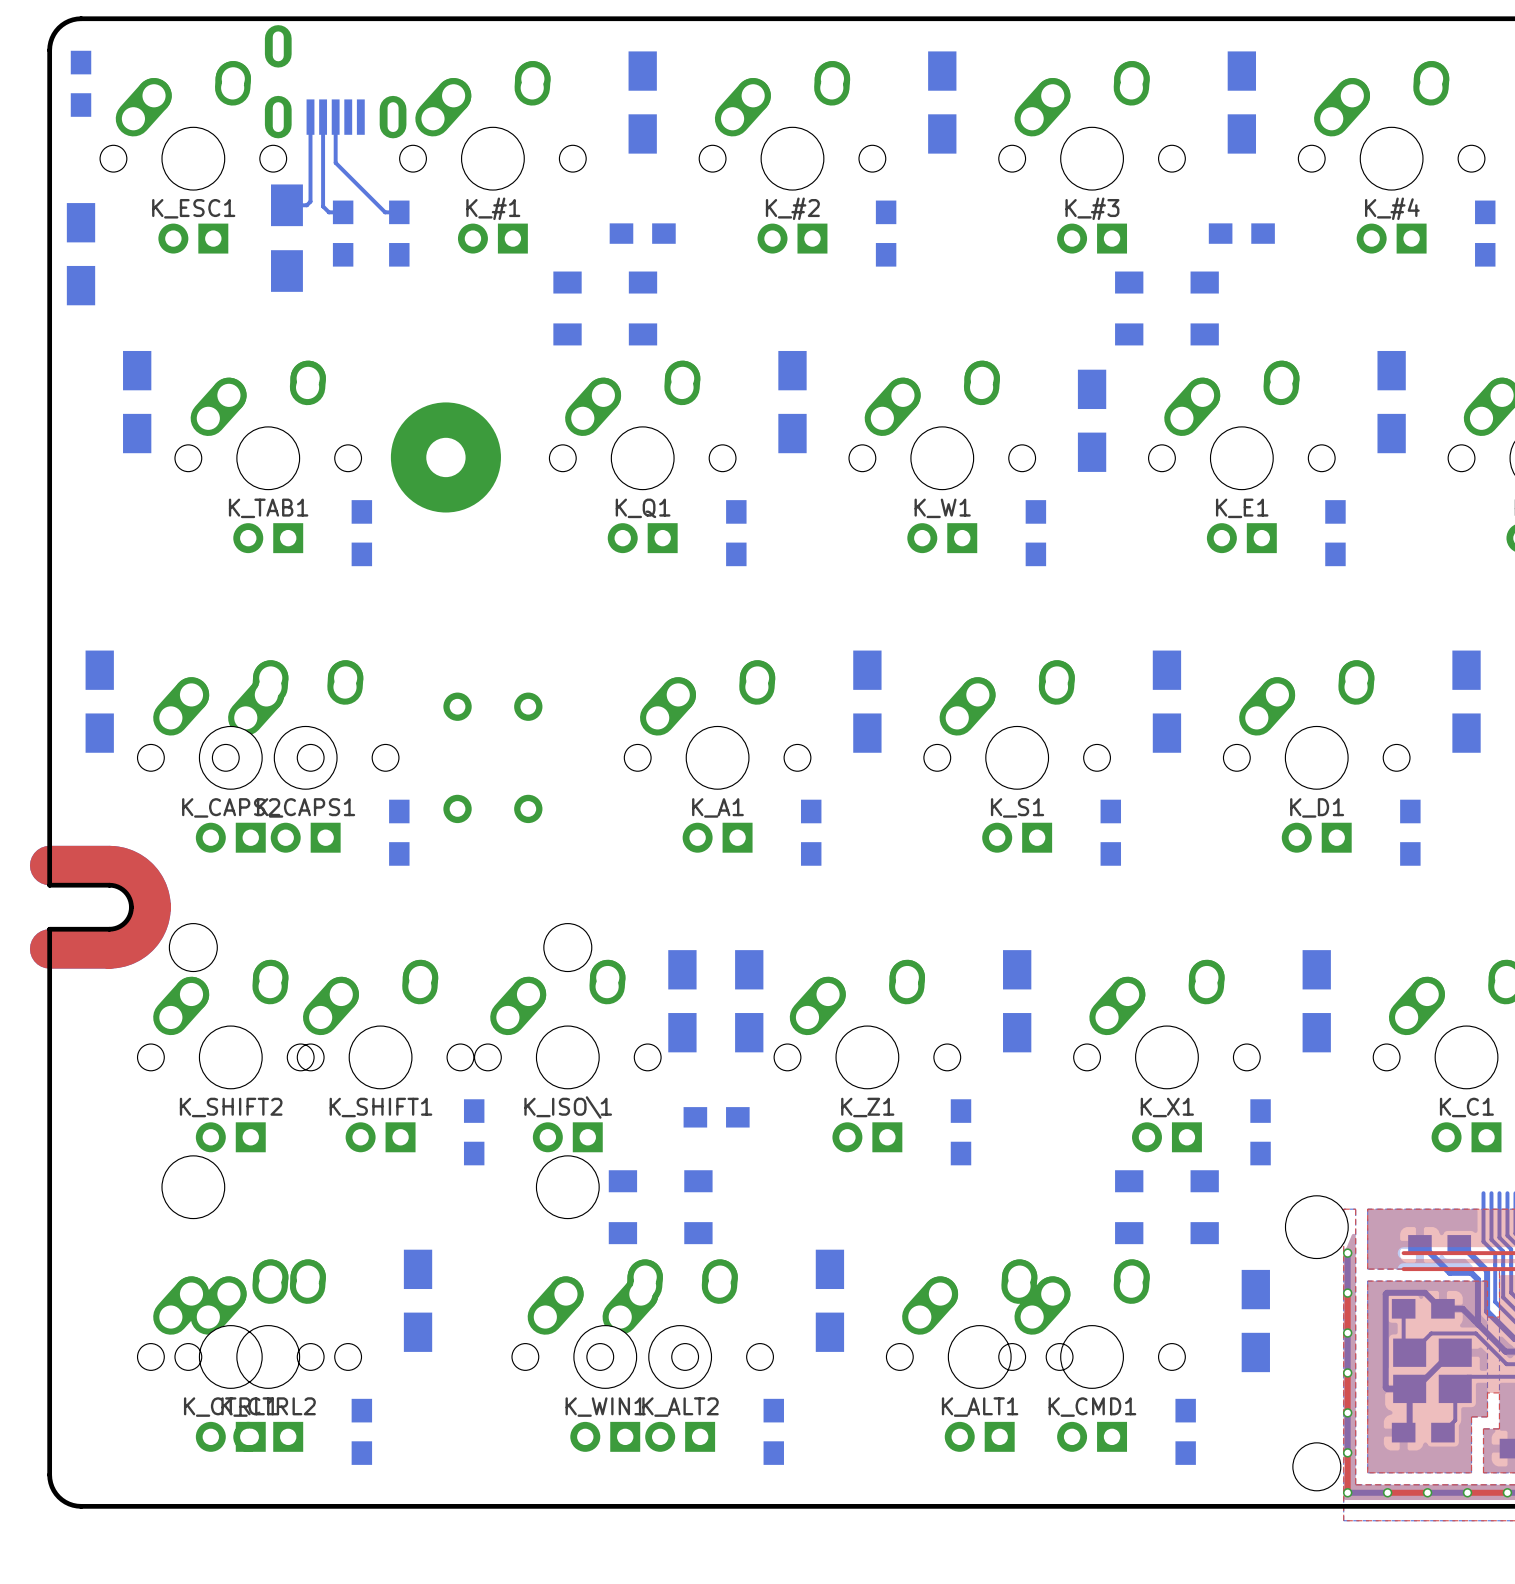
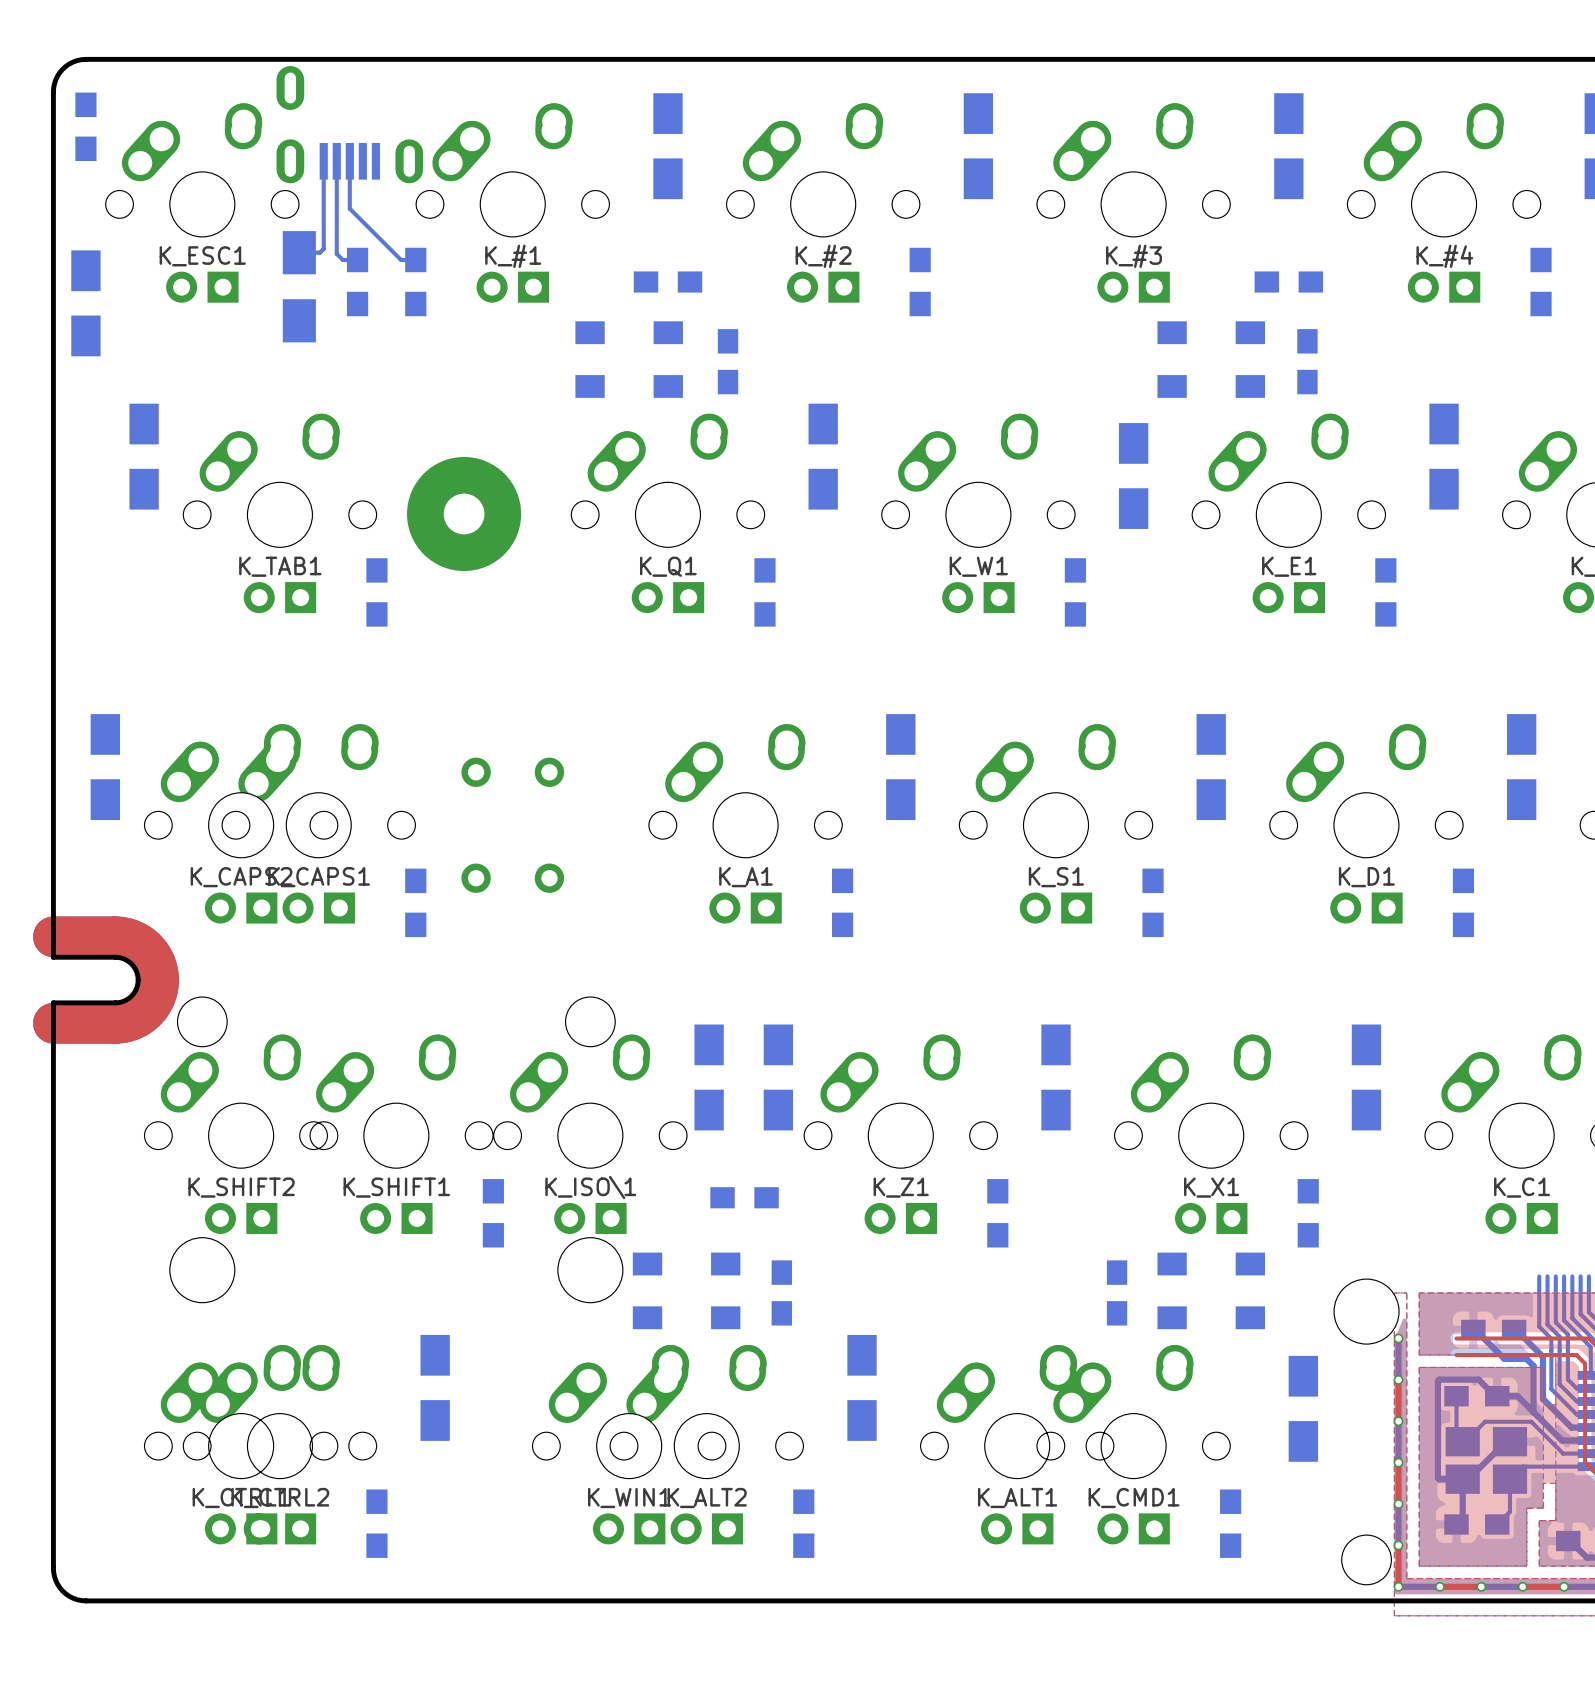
part: none -> (728, 361)
part: none -> (1307, 361)
part: none -> (781, 1292)
part: none -> (1117, 1292)

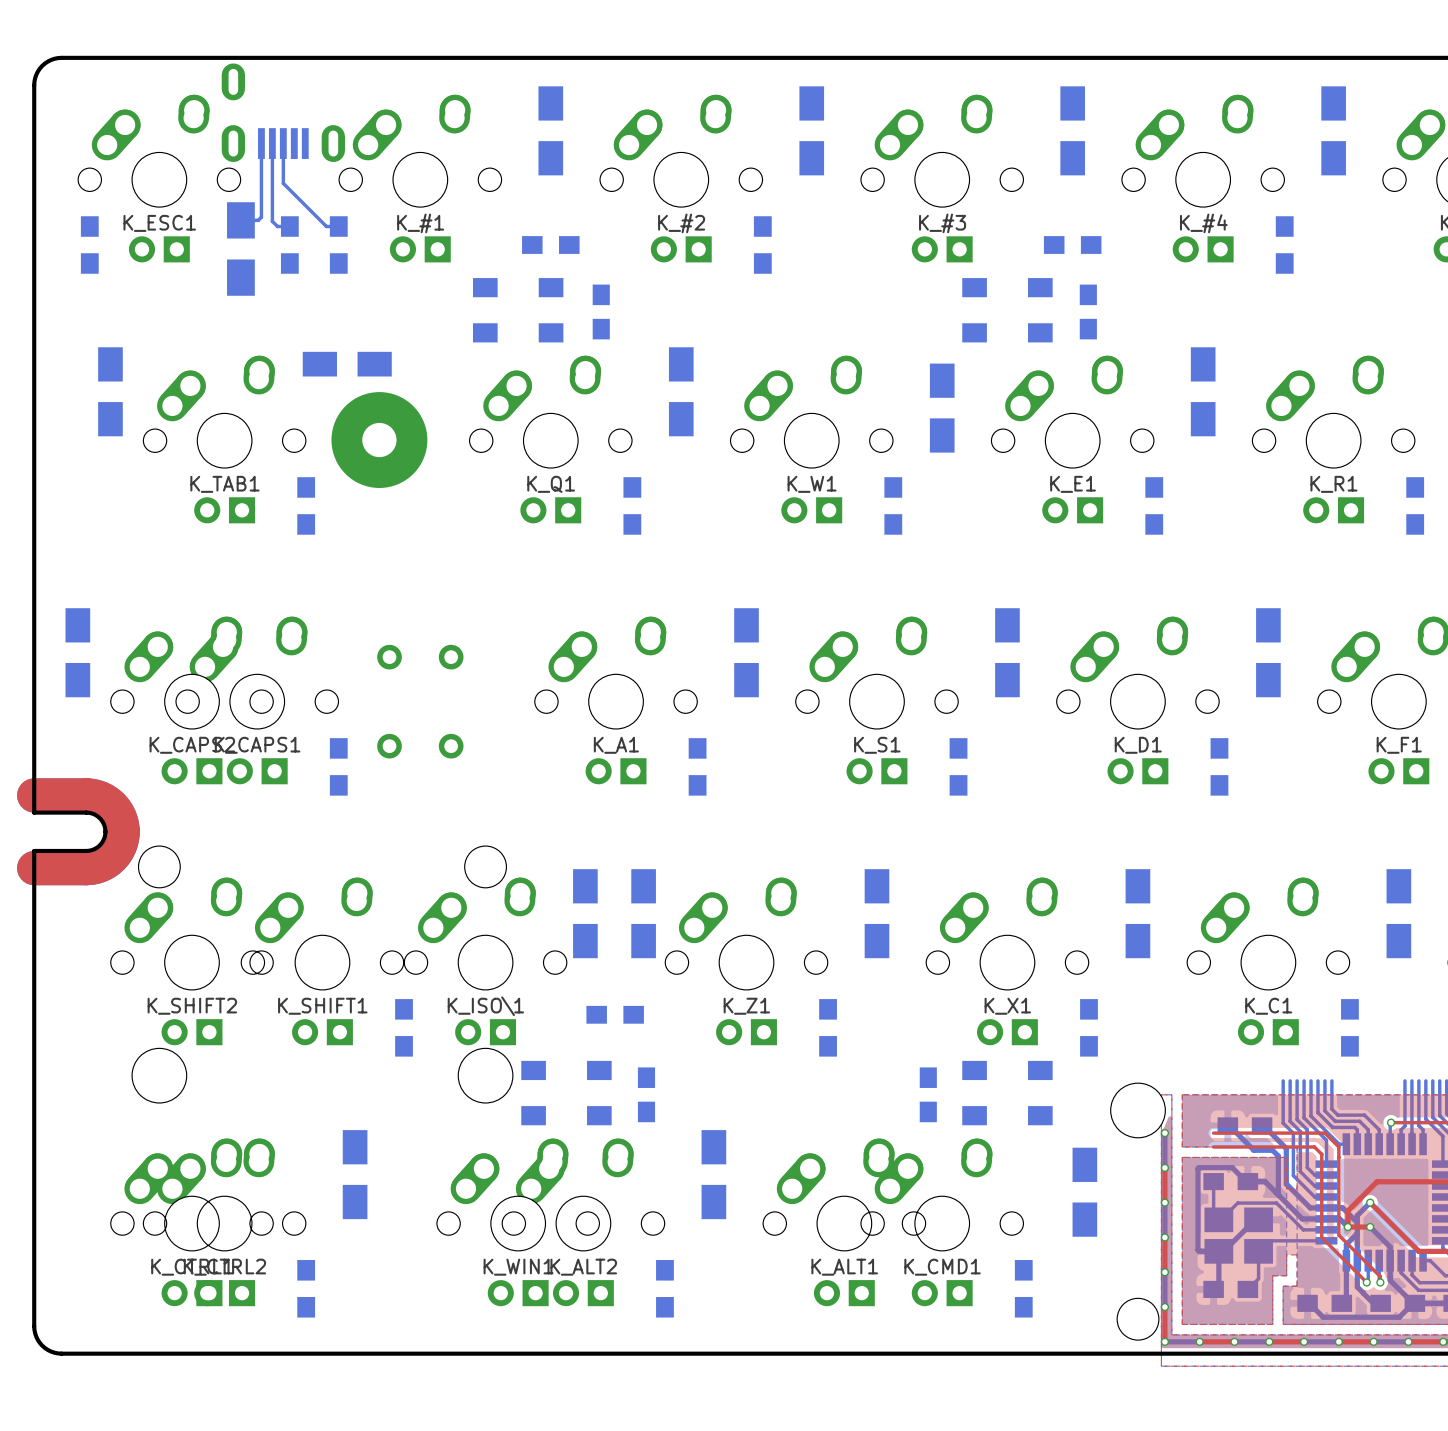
part position: (85, 126) -> (89, 245)
part rotation: 0° (85, 303) -> 90° clockwise (347, 364)
part position: (85, 303) -> (347, 364)

